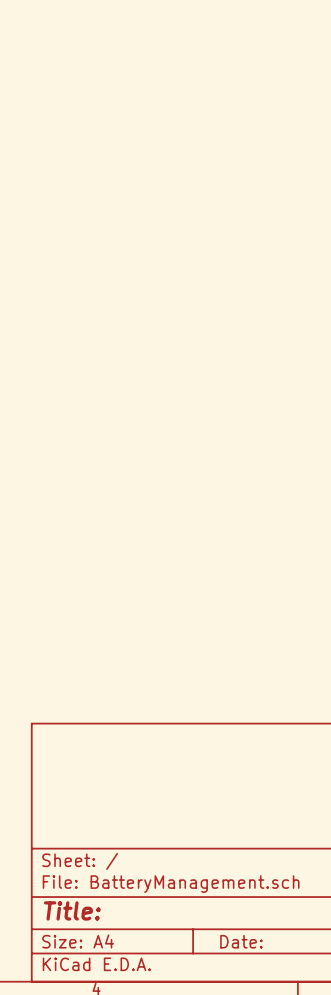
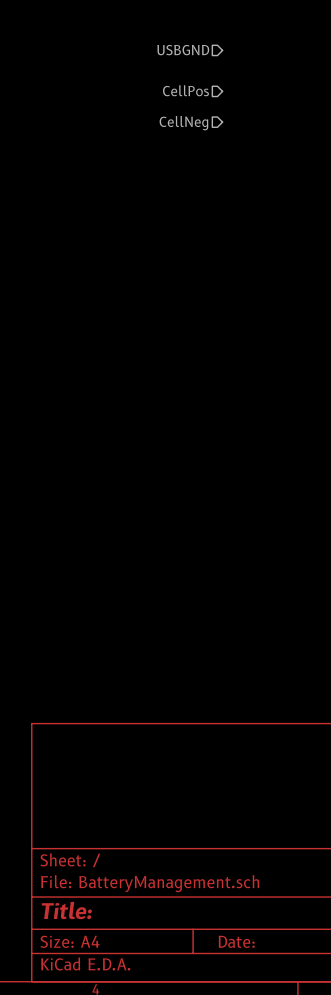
hierarchical label: none -> USBGND (183, 50)
hierarchical label: none -> CellPos (185, 90)
hierarchical label: none -> CellNeg (183, 123)

